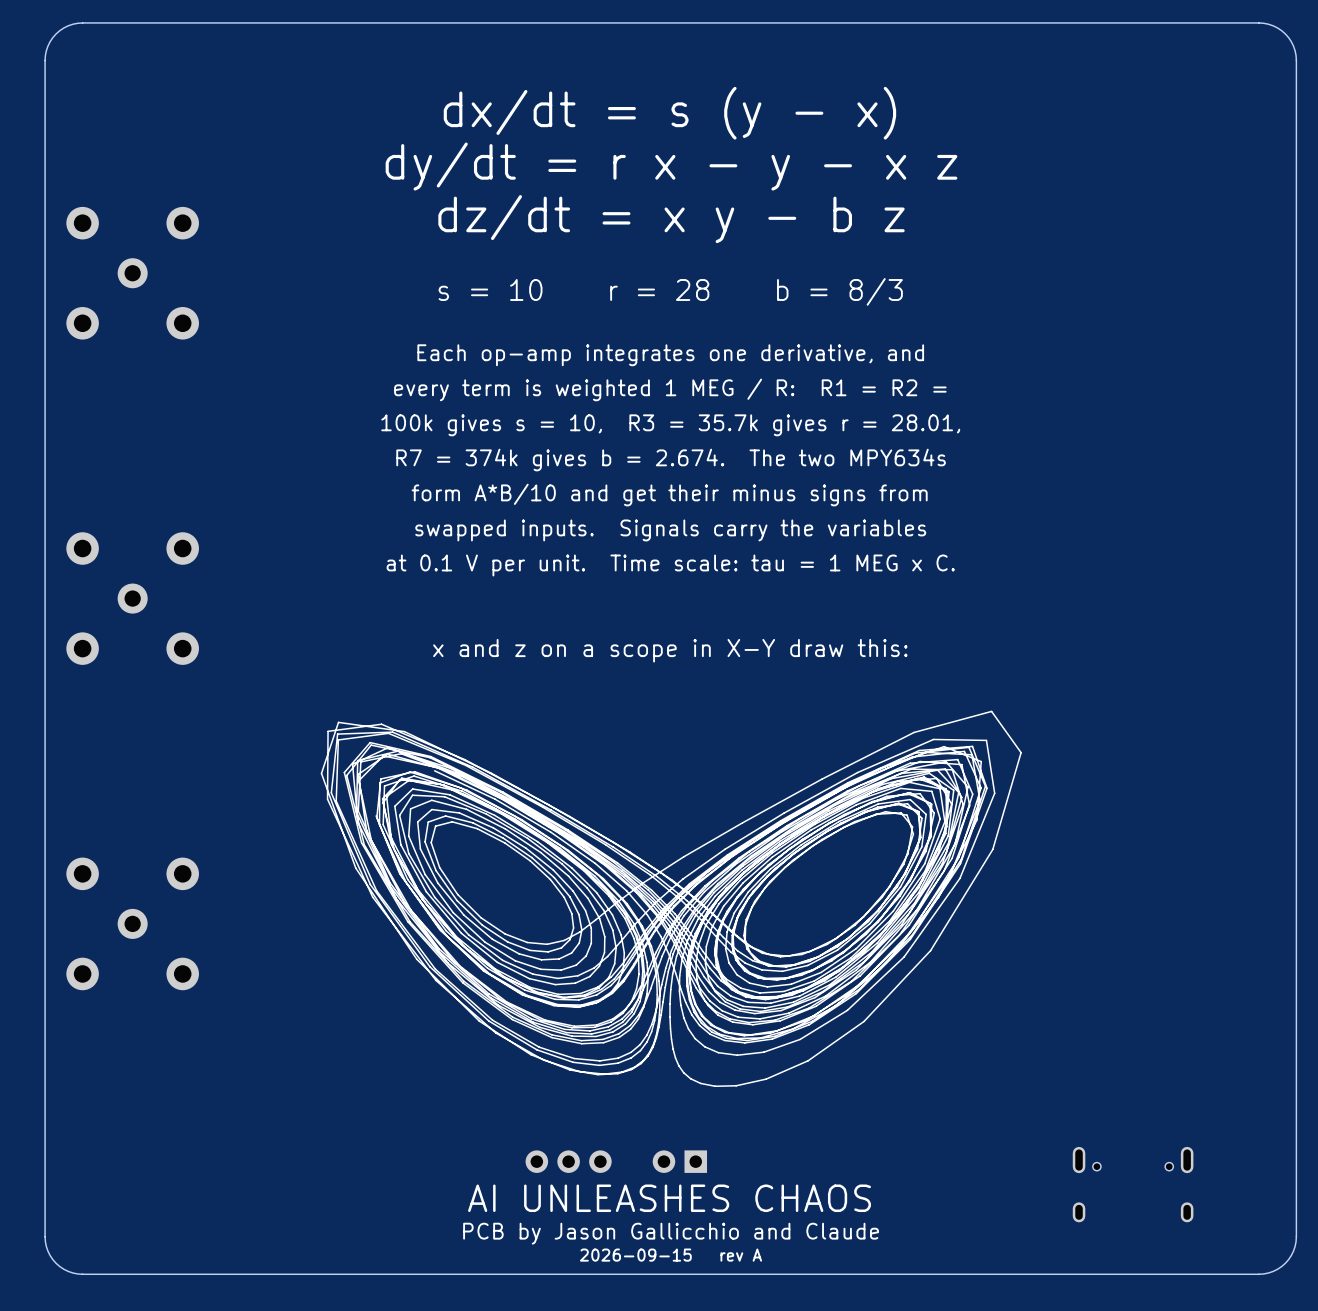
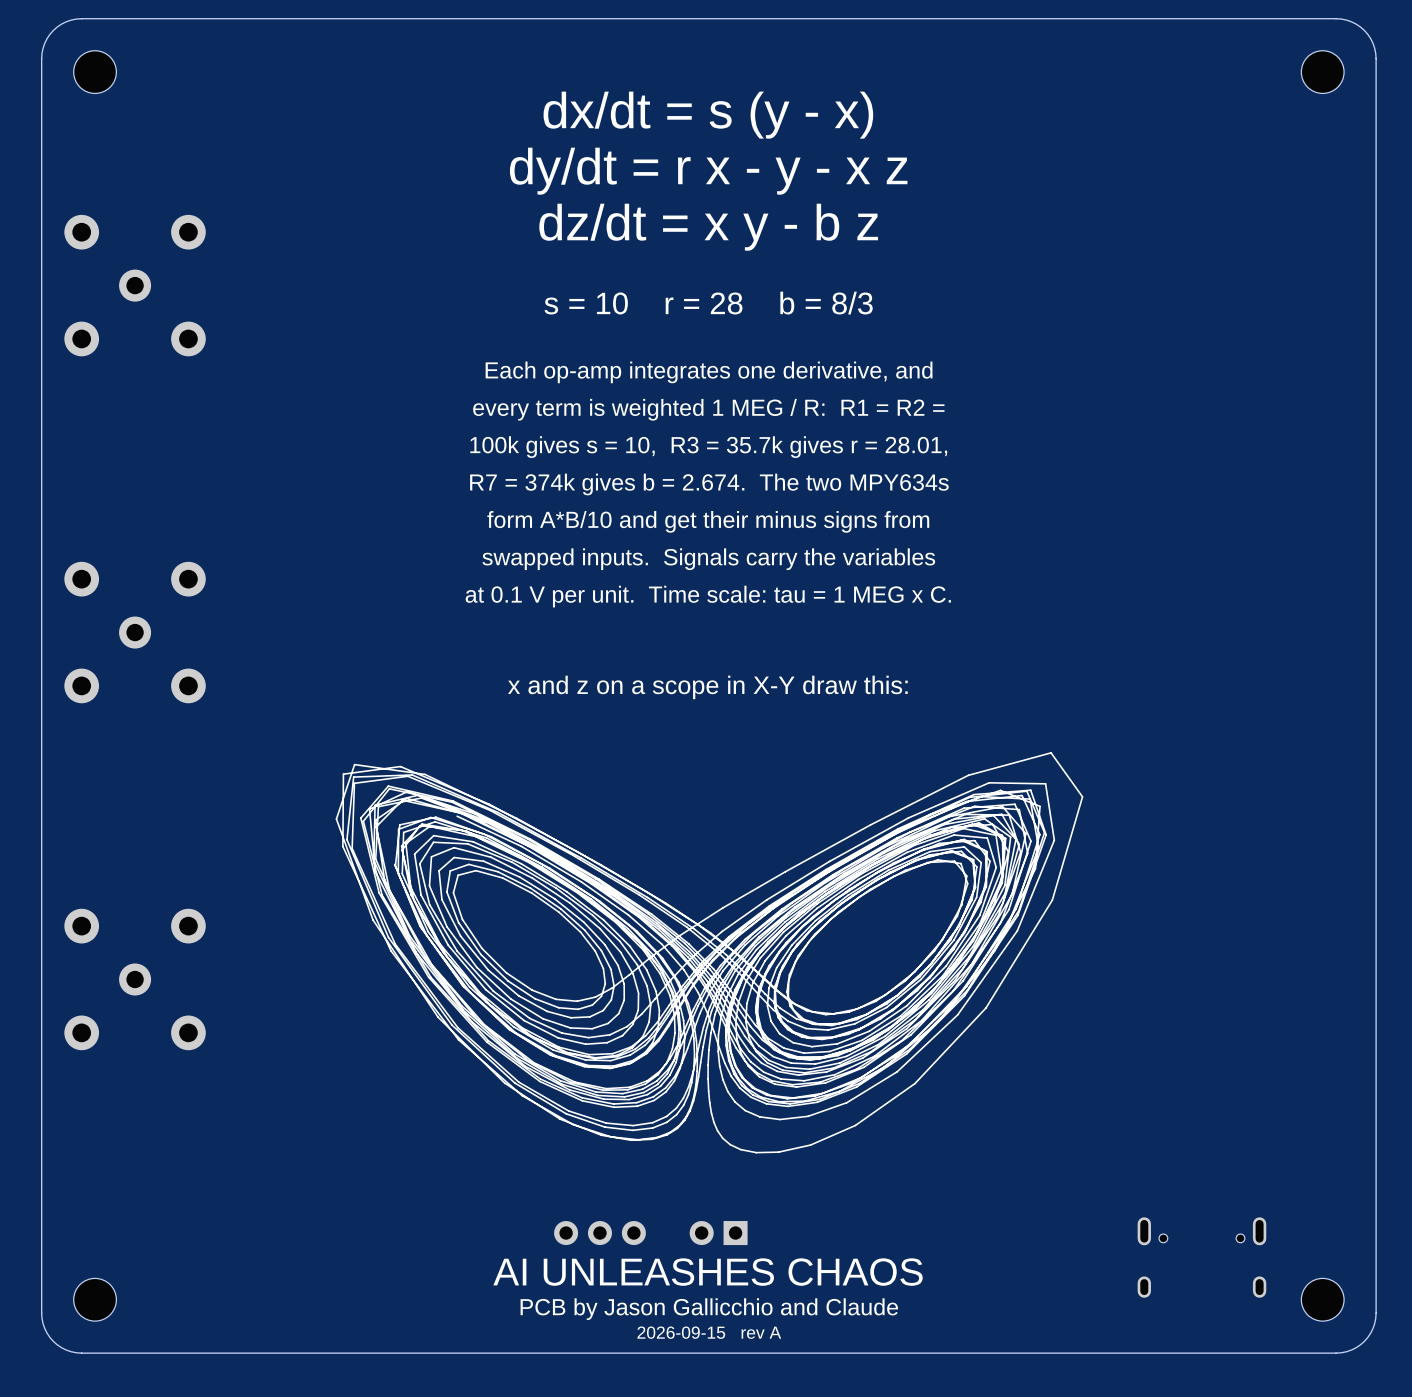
part: none -> (95, 72)
part: none -> (1322, 72)
part: none -> (95, 1299)
part: none -> (1322, 1299)

